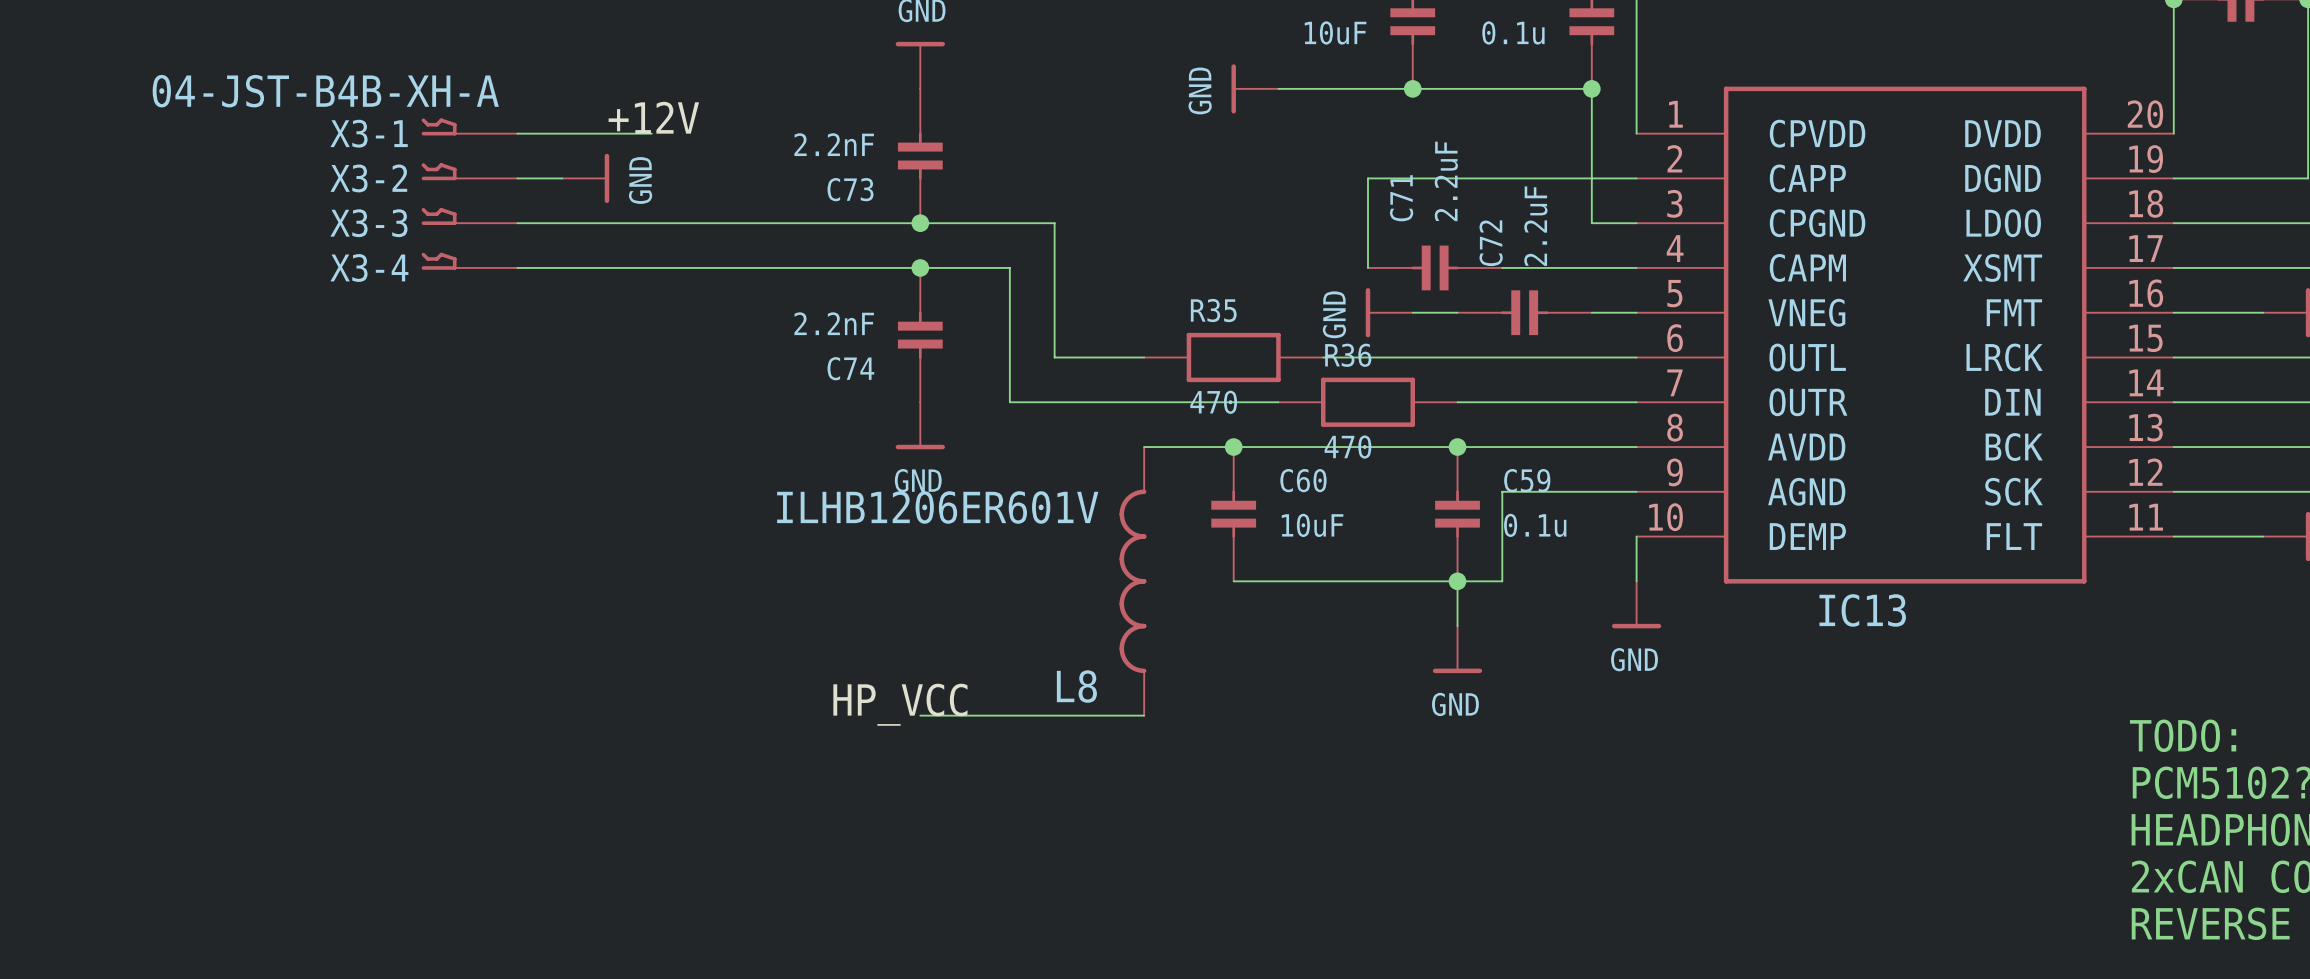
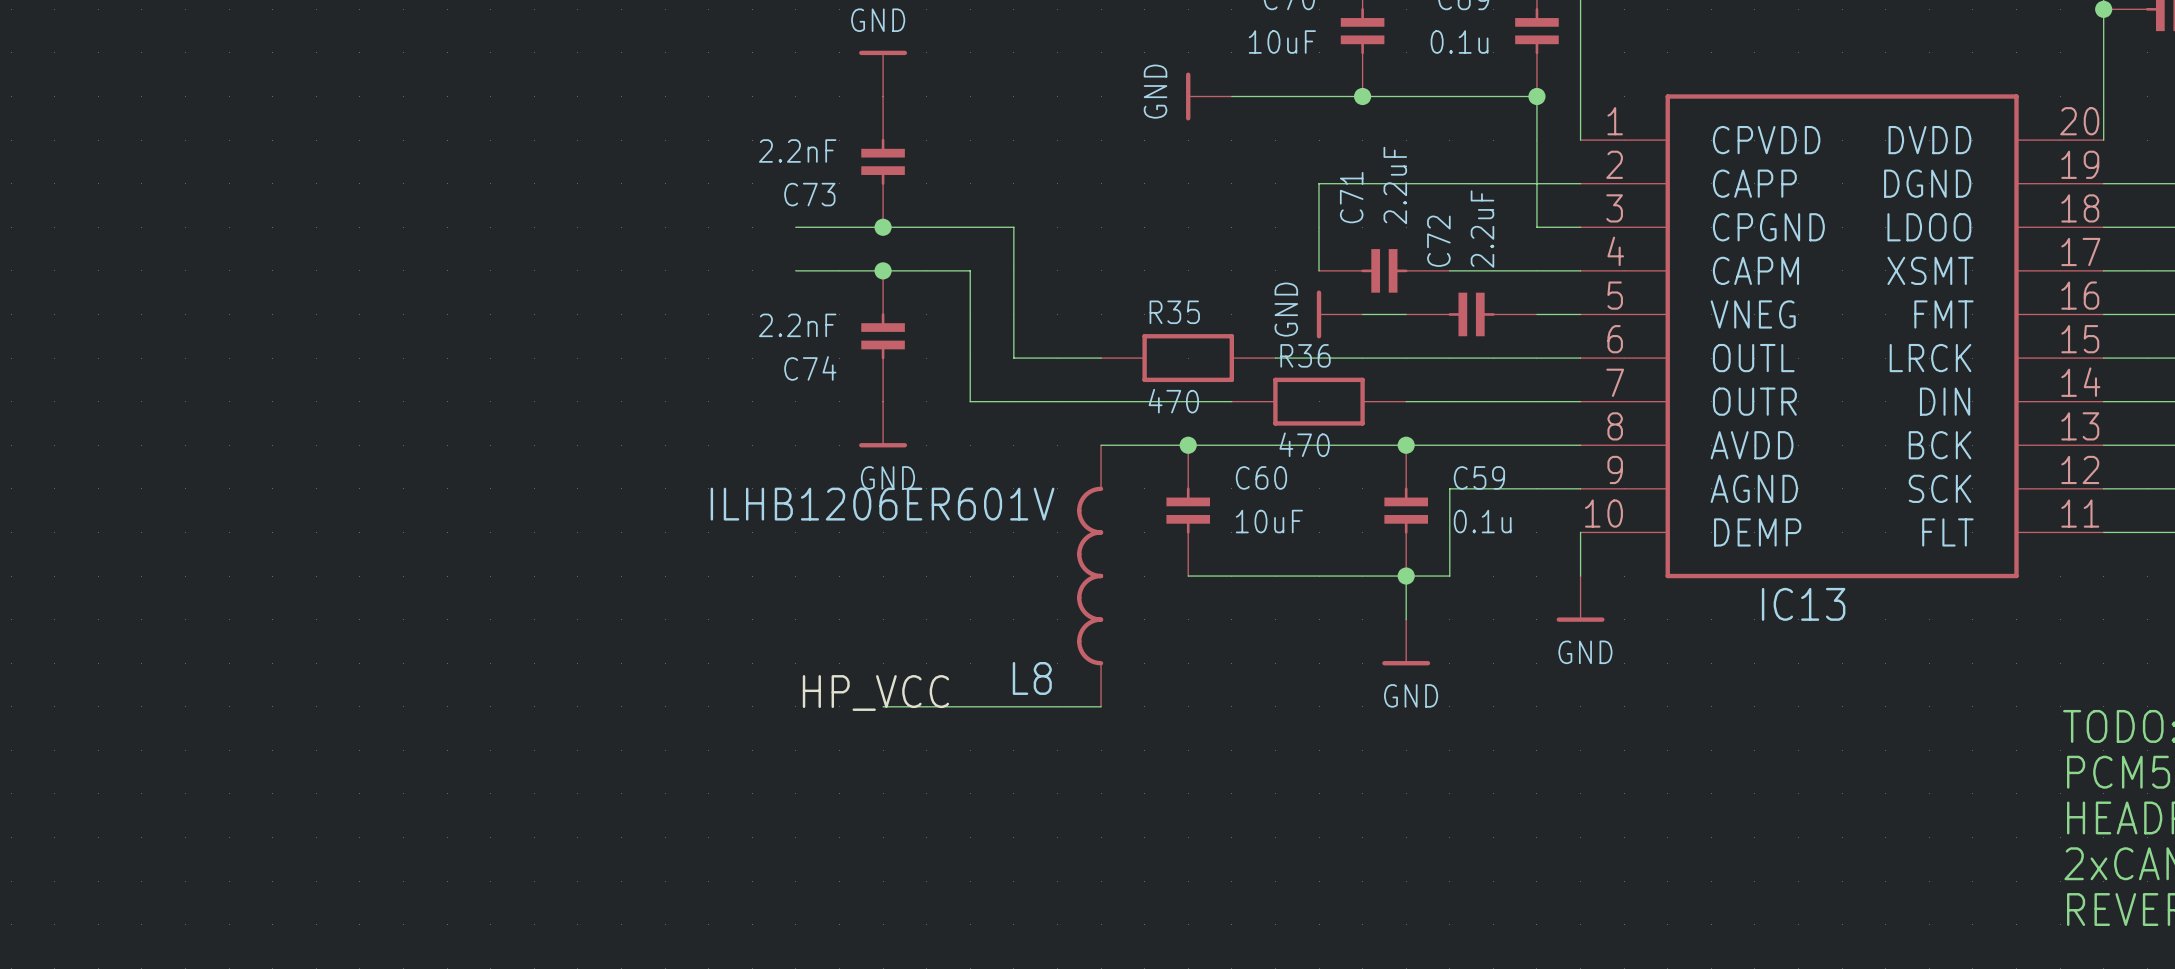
label: +12V (653, 117) -> none
X3-1: 04-JST-B4B-XH-A (469, 126) -> none
wire: (517, 133) (651, 133) -> none
X3-2: (469, 171) -> none
wire: (517, 178) (562, 178) -> none
power symbol: GND (585, 178) -> none
X3-3: (469, 216) -> none
wire: (517, 223) (830, 223) -> none
X3-4: (469, 261) -> none
wire: (517, 267) (830, 267) -> none

